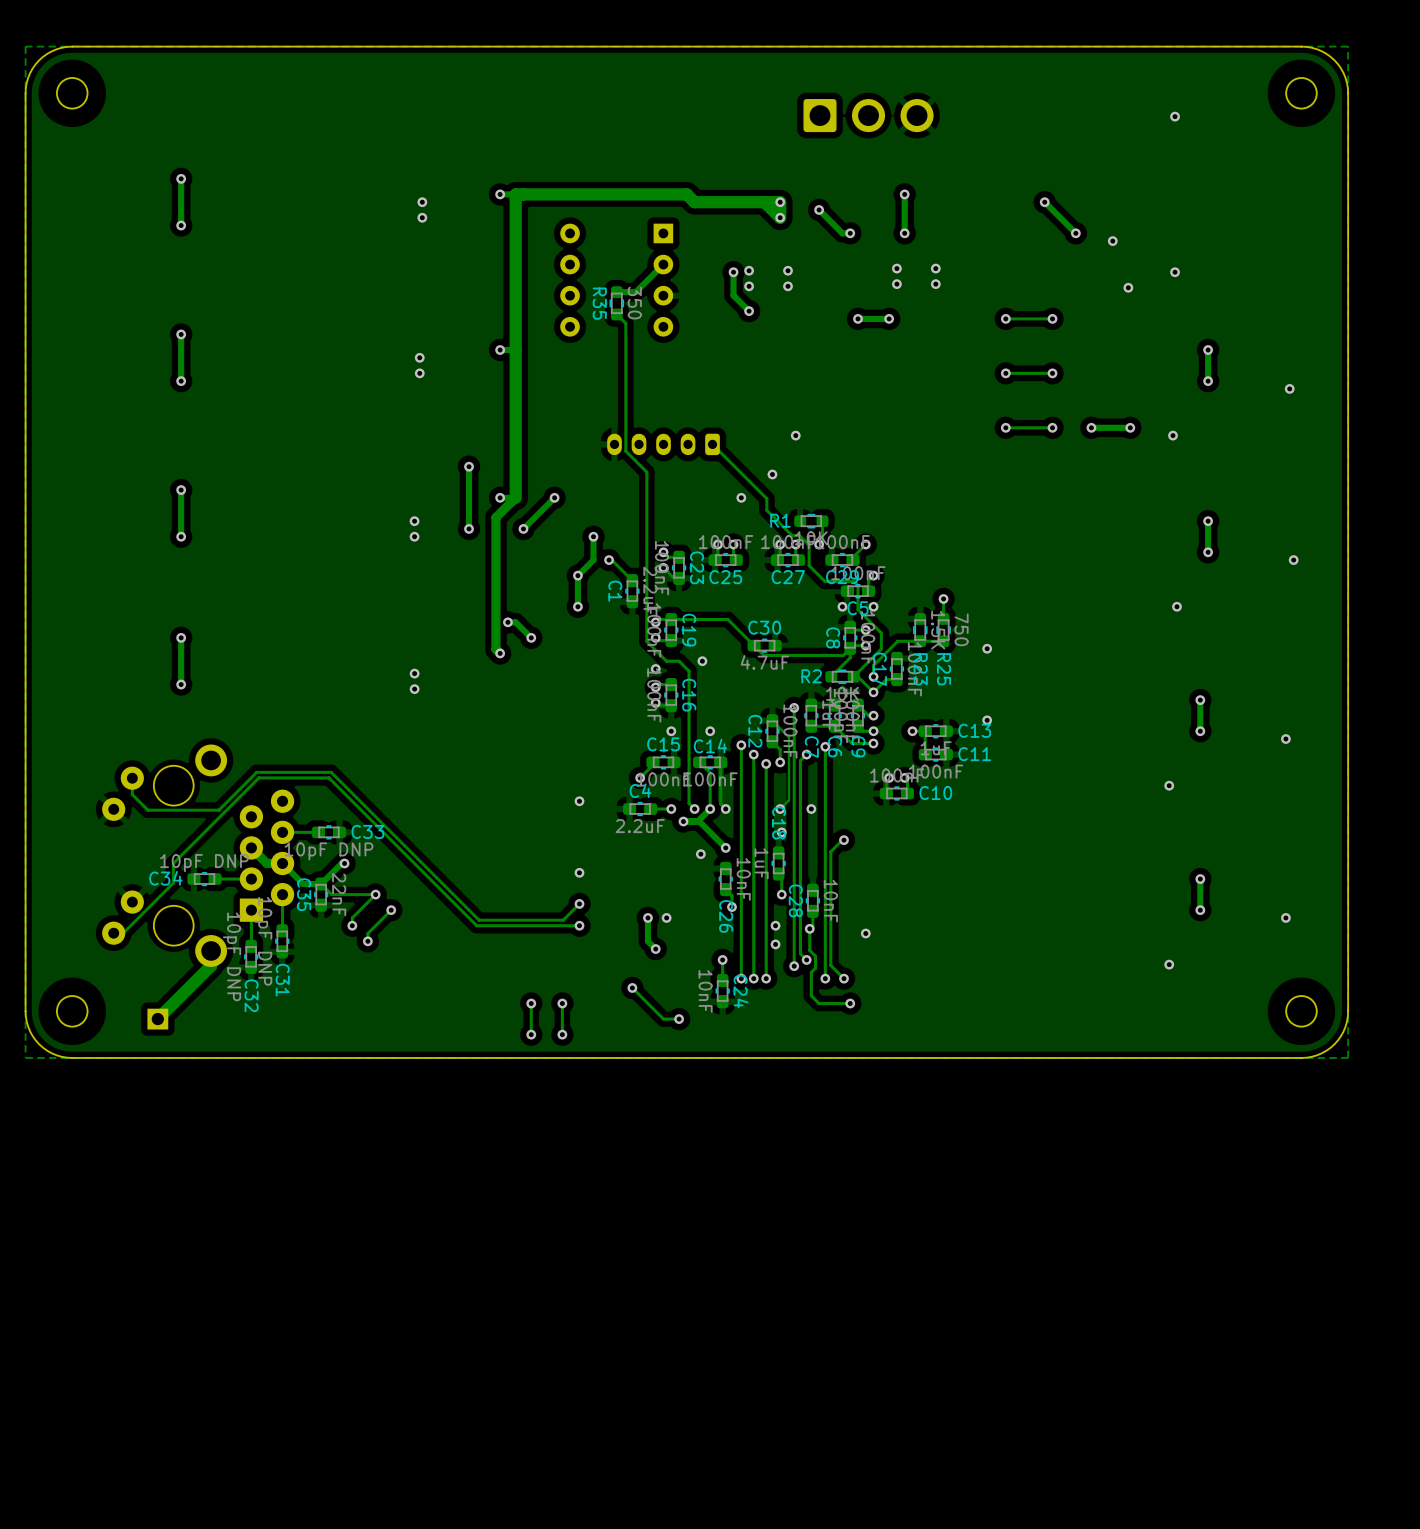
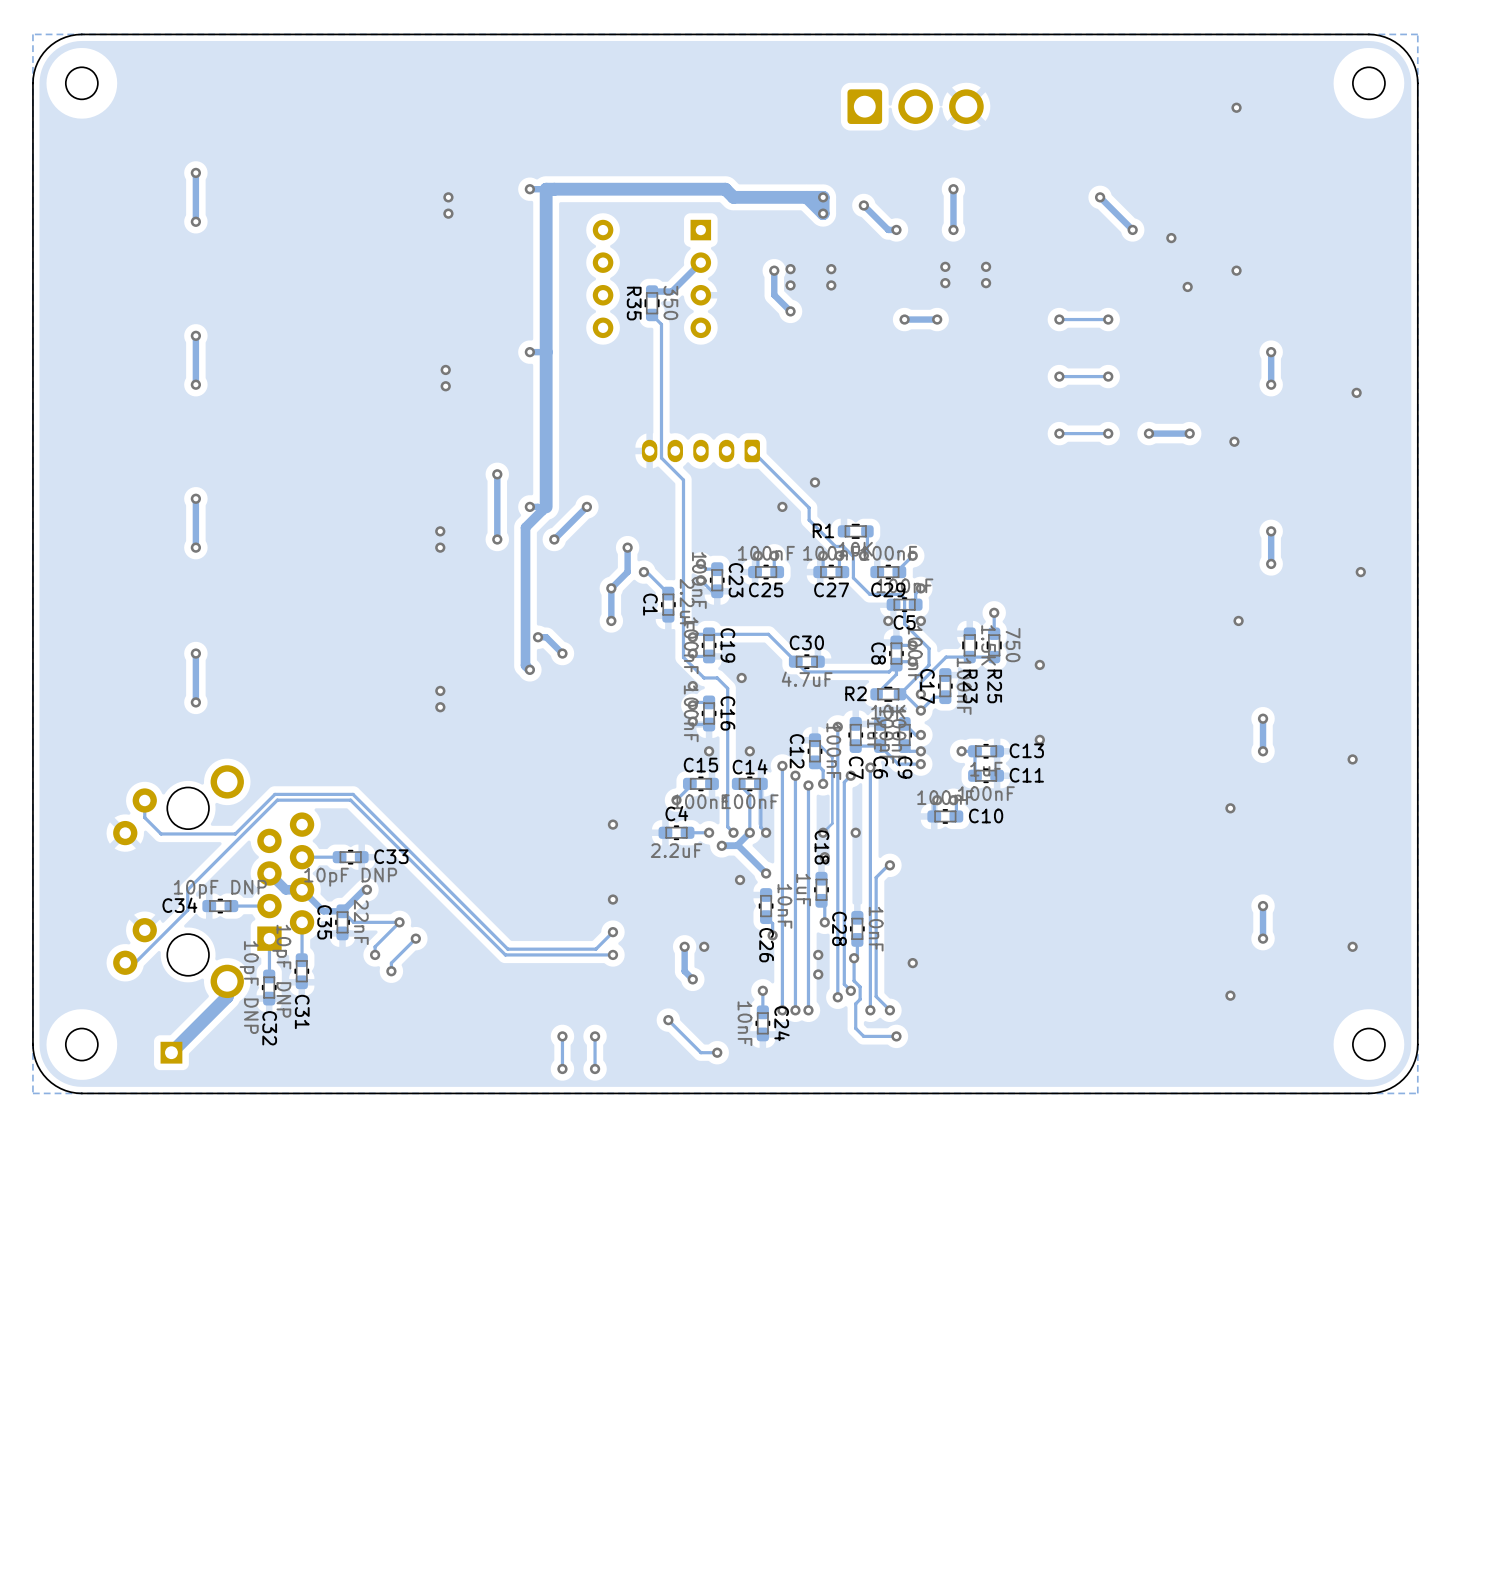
via: (419, 357) -> none
via: none -> (445, 369)
via: (419, 373) -> none
via: none -> (445, 386)
via: (795, 435) -> none

